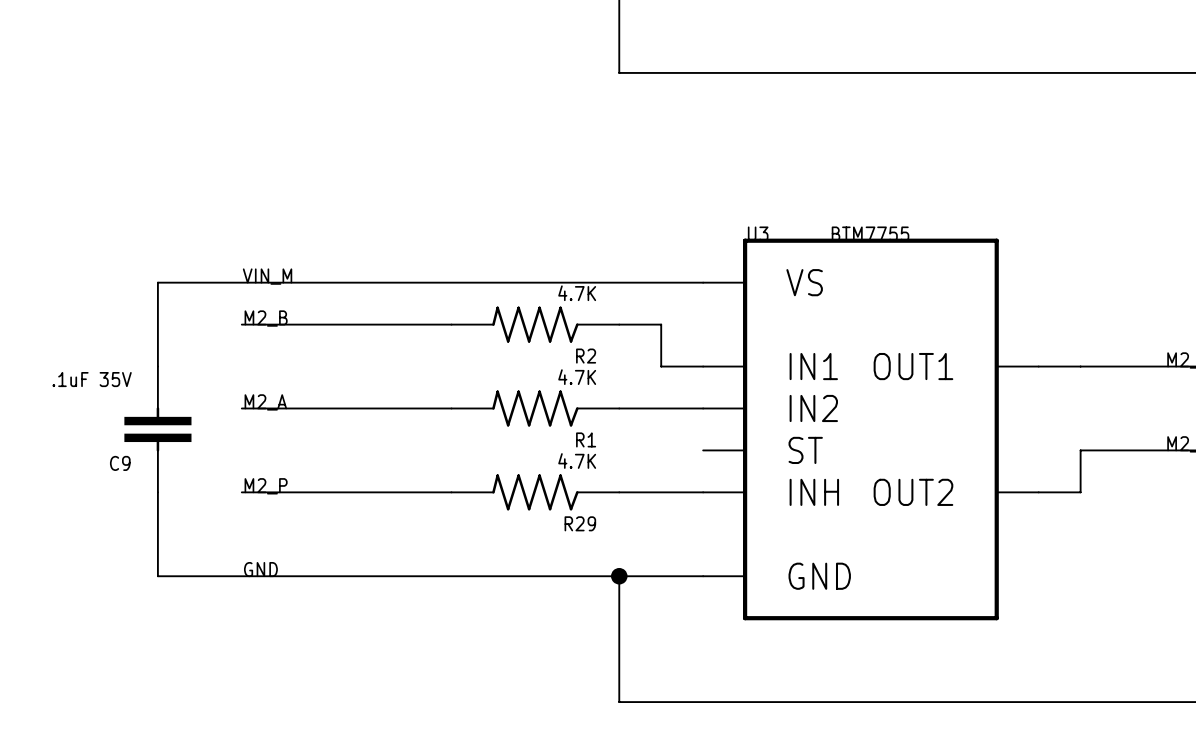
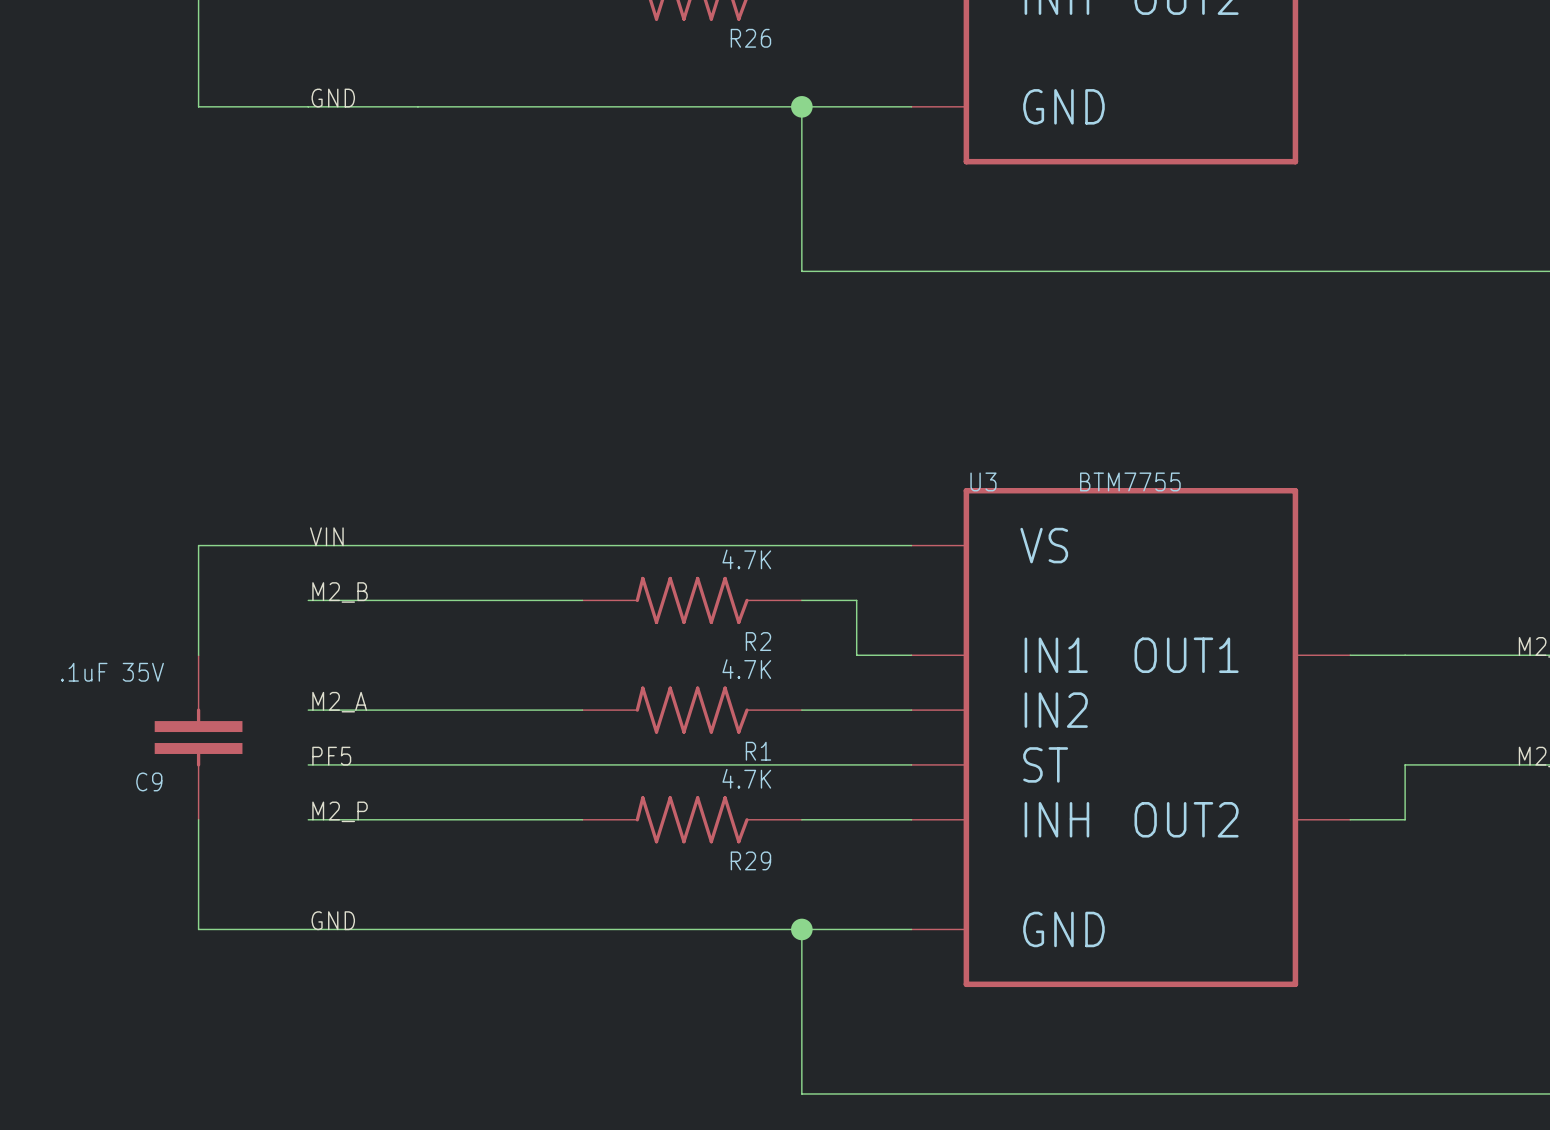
label: VIN_M (267, 276) -> VIN (326, 536)
label: none -> PF5 (331, 756)
wire: none -> (308, 764) (911, 764)

